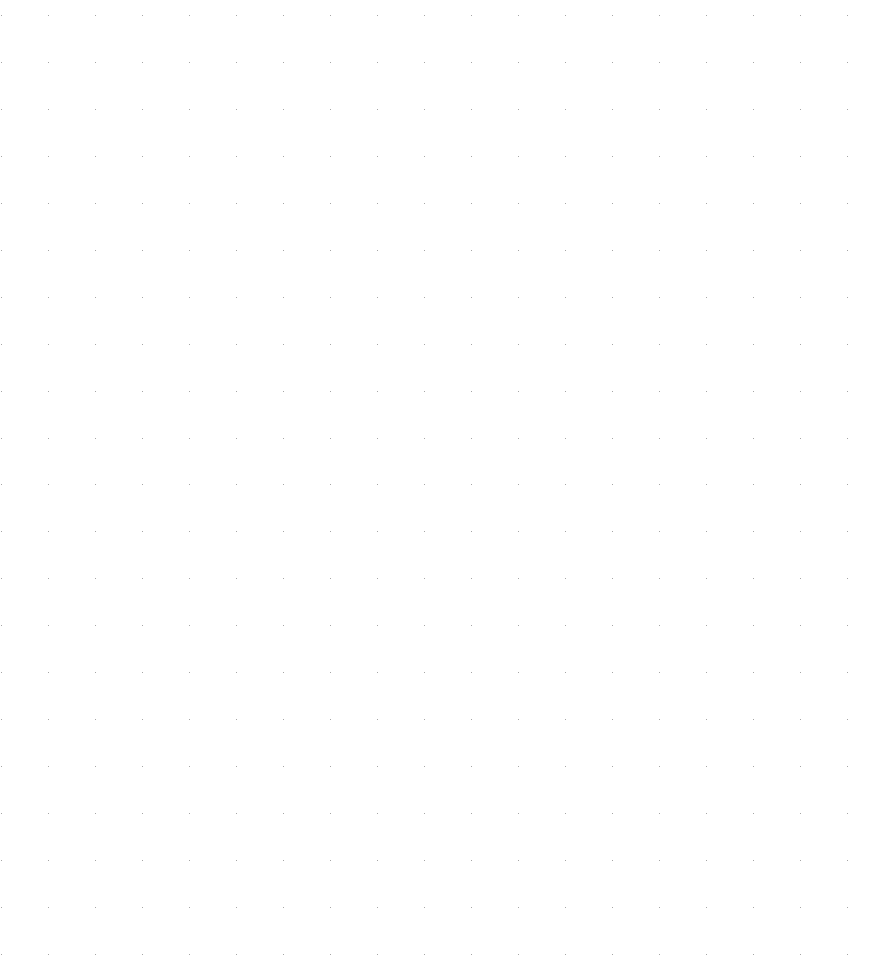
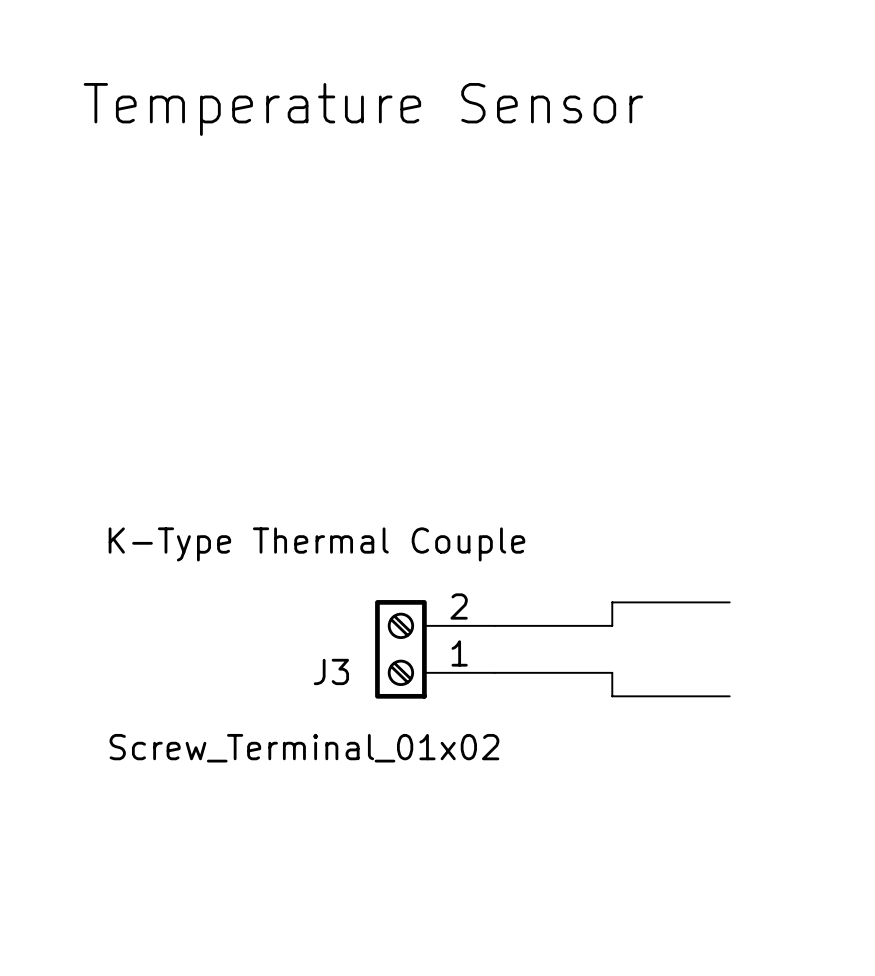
text: none -> Temperature Sensor (363, 109)
text: none -> K-Type Thermal Couple (316, 544)
wire: none -> (729, 602) (612, 602) (612, 625) (494, 625)
J3: none -> Screw_Terminal_01x02 (434, 649)
wire: none -> (494, 672) (612, 672) (612, 696) (729, 696)

